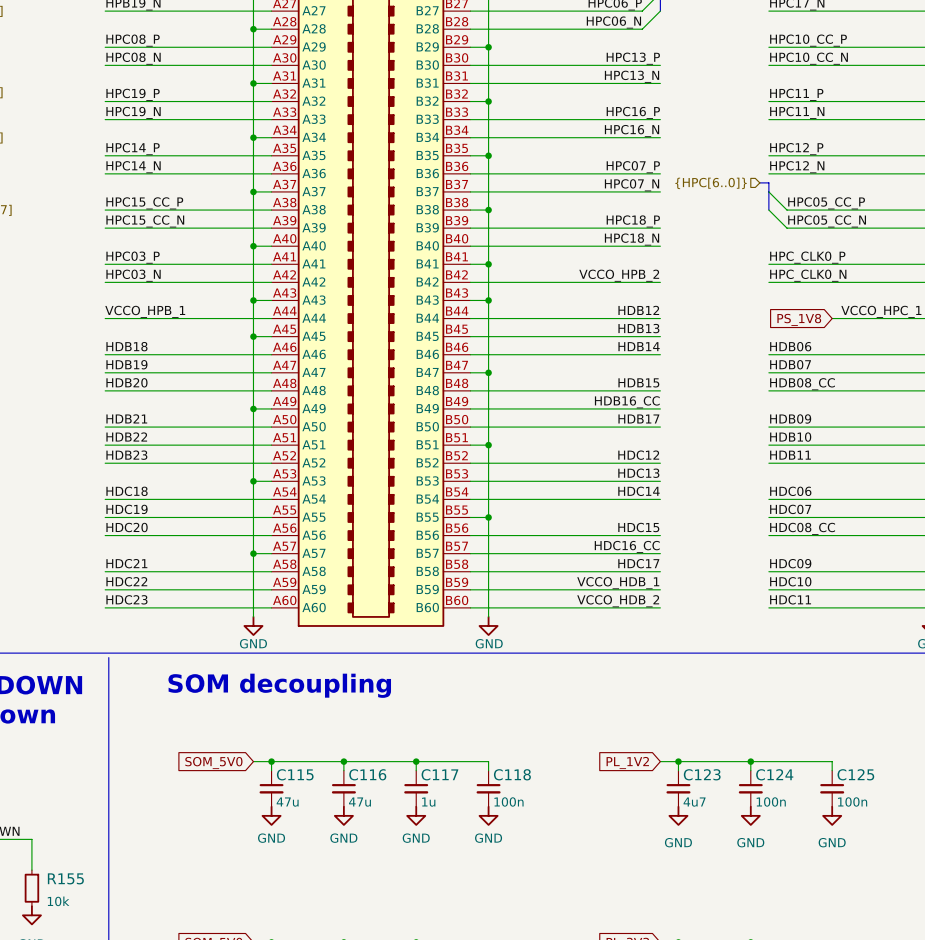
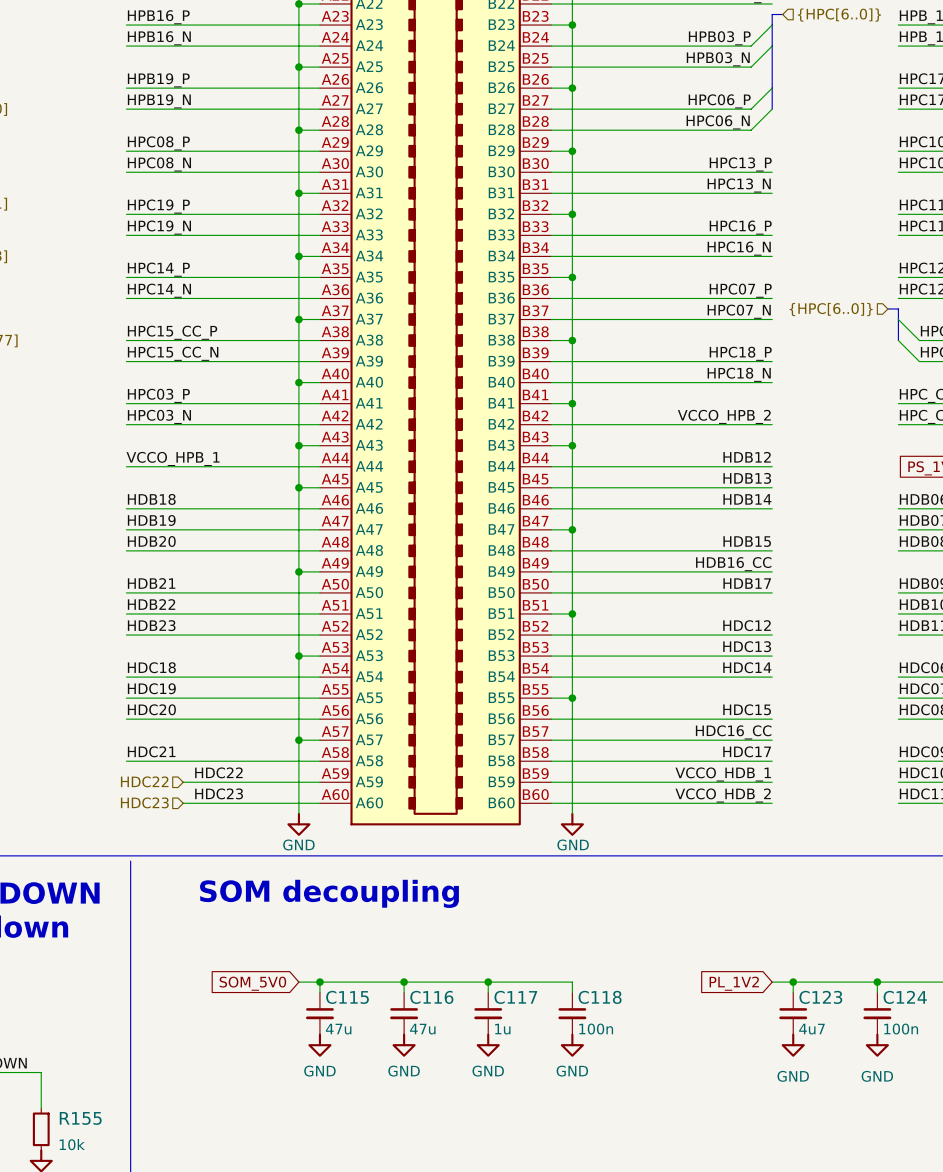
label position: HDC22 (126, 581) -> HDC22 (218, 772)
wire: (105, 589) (154, 589) -> none
hierarchical label: none -> HDC22 (144, 781)
label position: HDC23 (126, 599) -> HDC23 (219, 793)
wire: (105, 607) (154, 607) -> none
hierarchical label: none -> HDC23 (144, 802)

